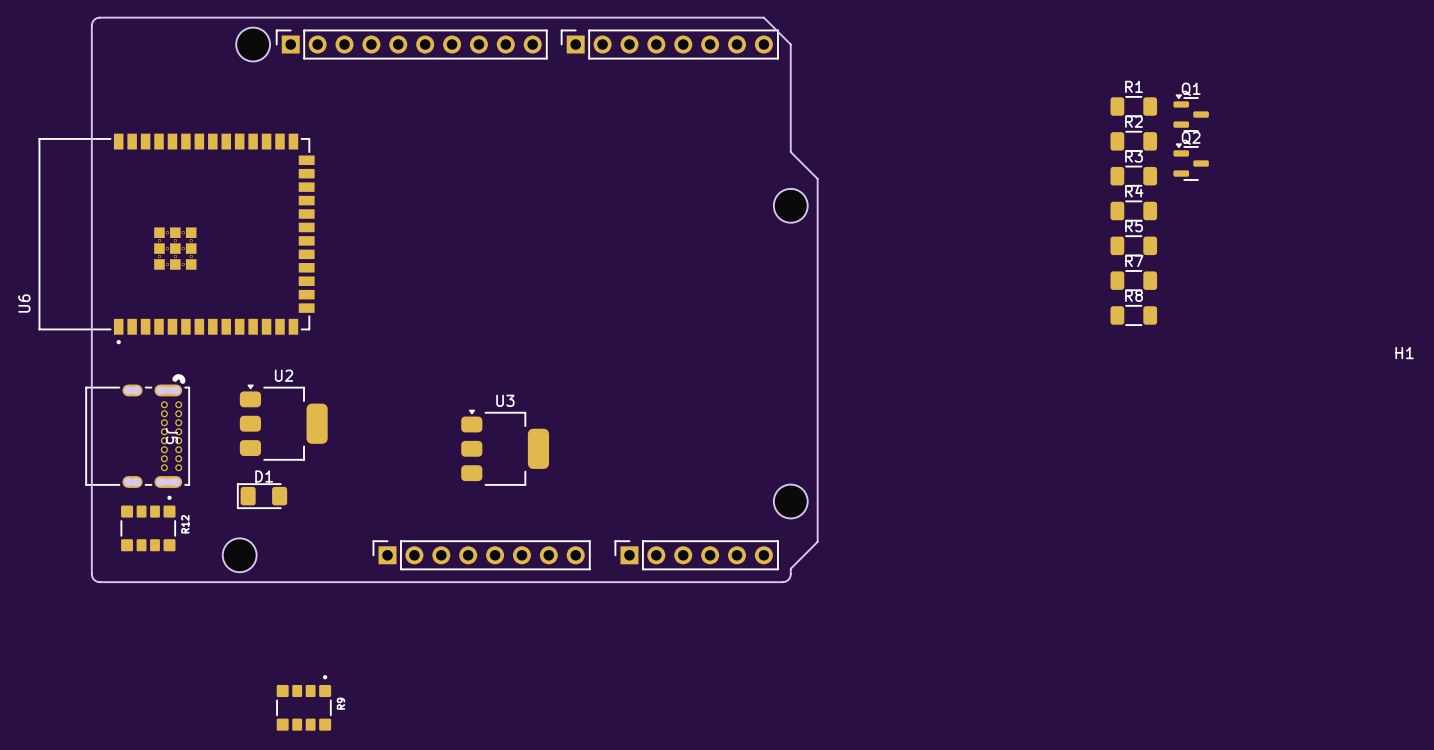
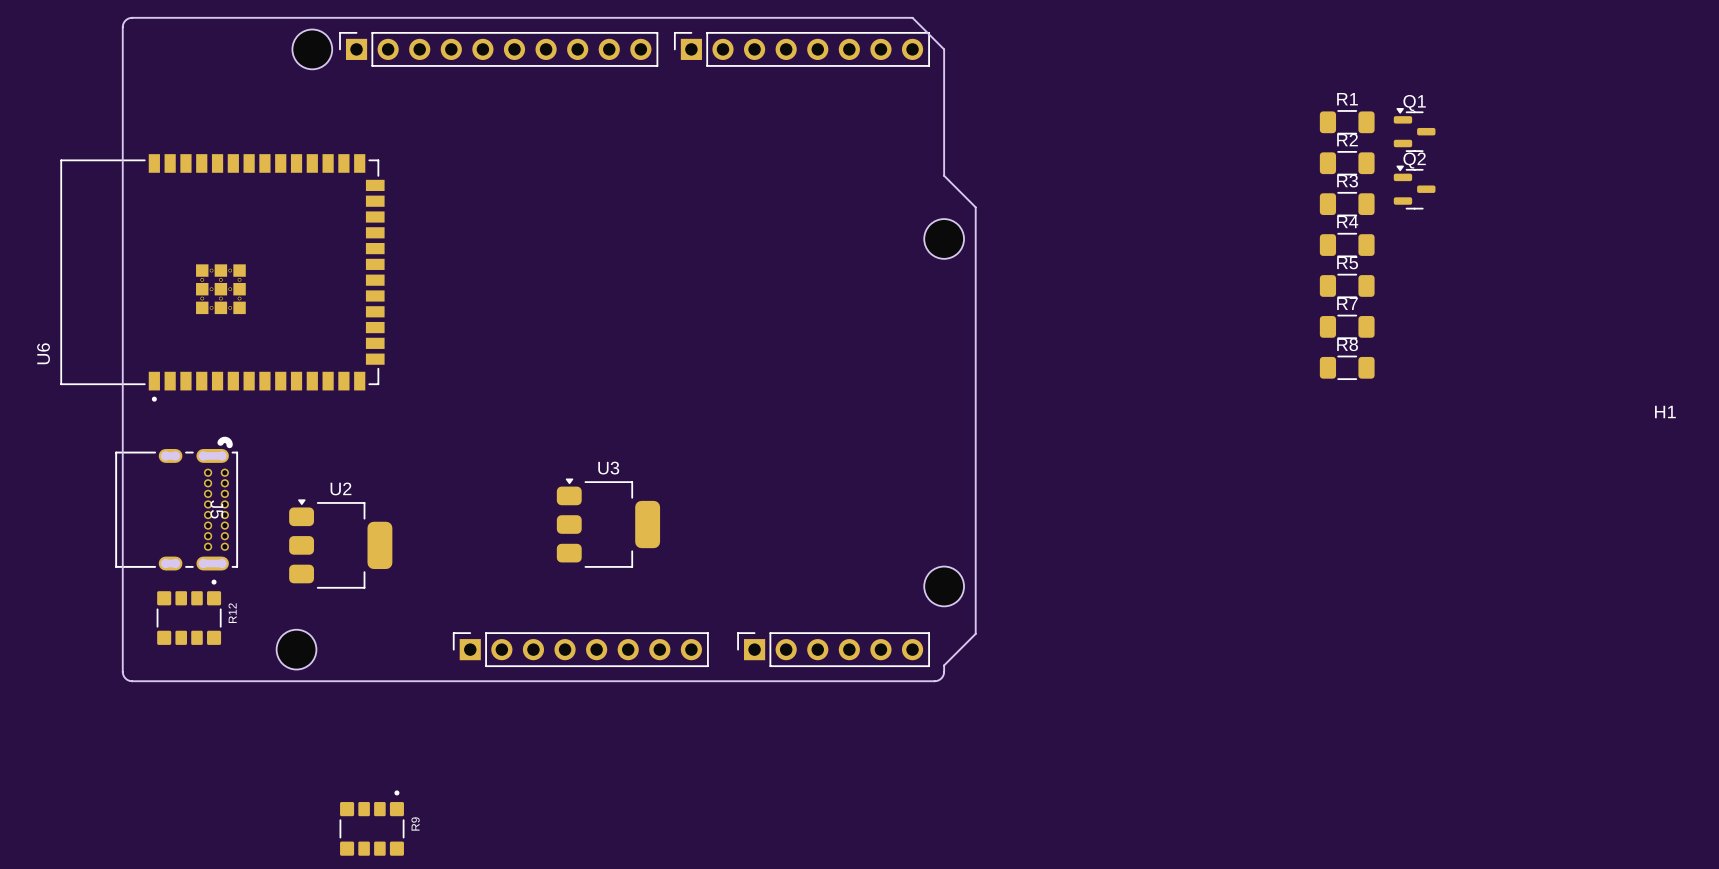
U2 position: (283, 422) -> (340, 543)
D1: (262, 496) -> none

